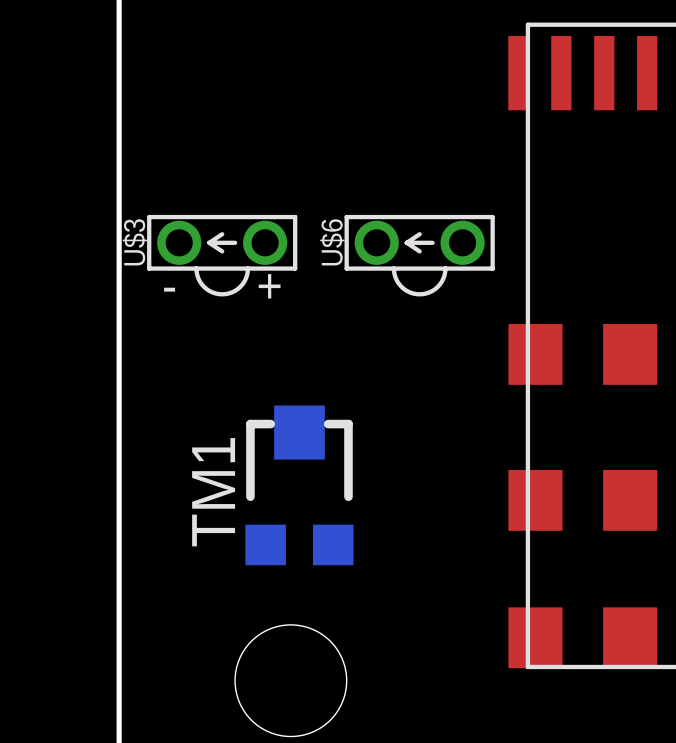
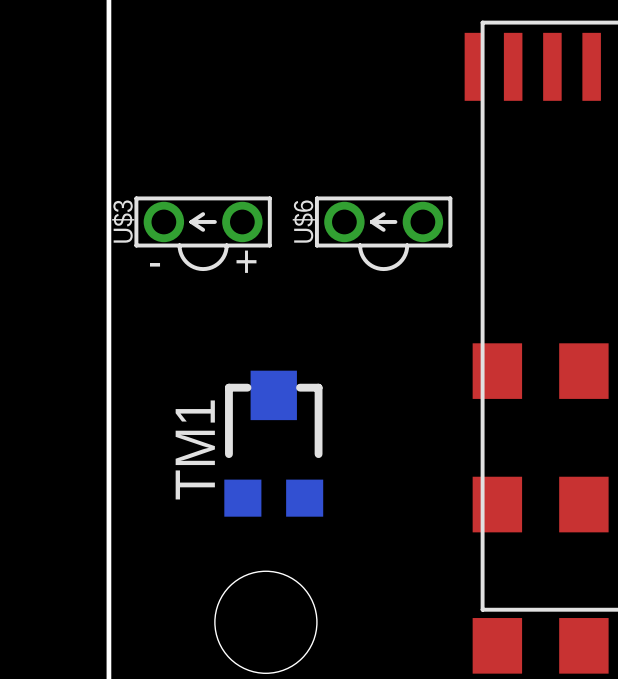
part: (582, 354) -> none
part: none -> (540, 371)
part: (582, 500) -> none
part: none -> (540, 504)
part: (582, 637) -> none
part: none -> (540, 645)

